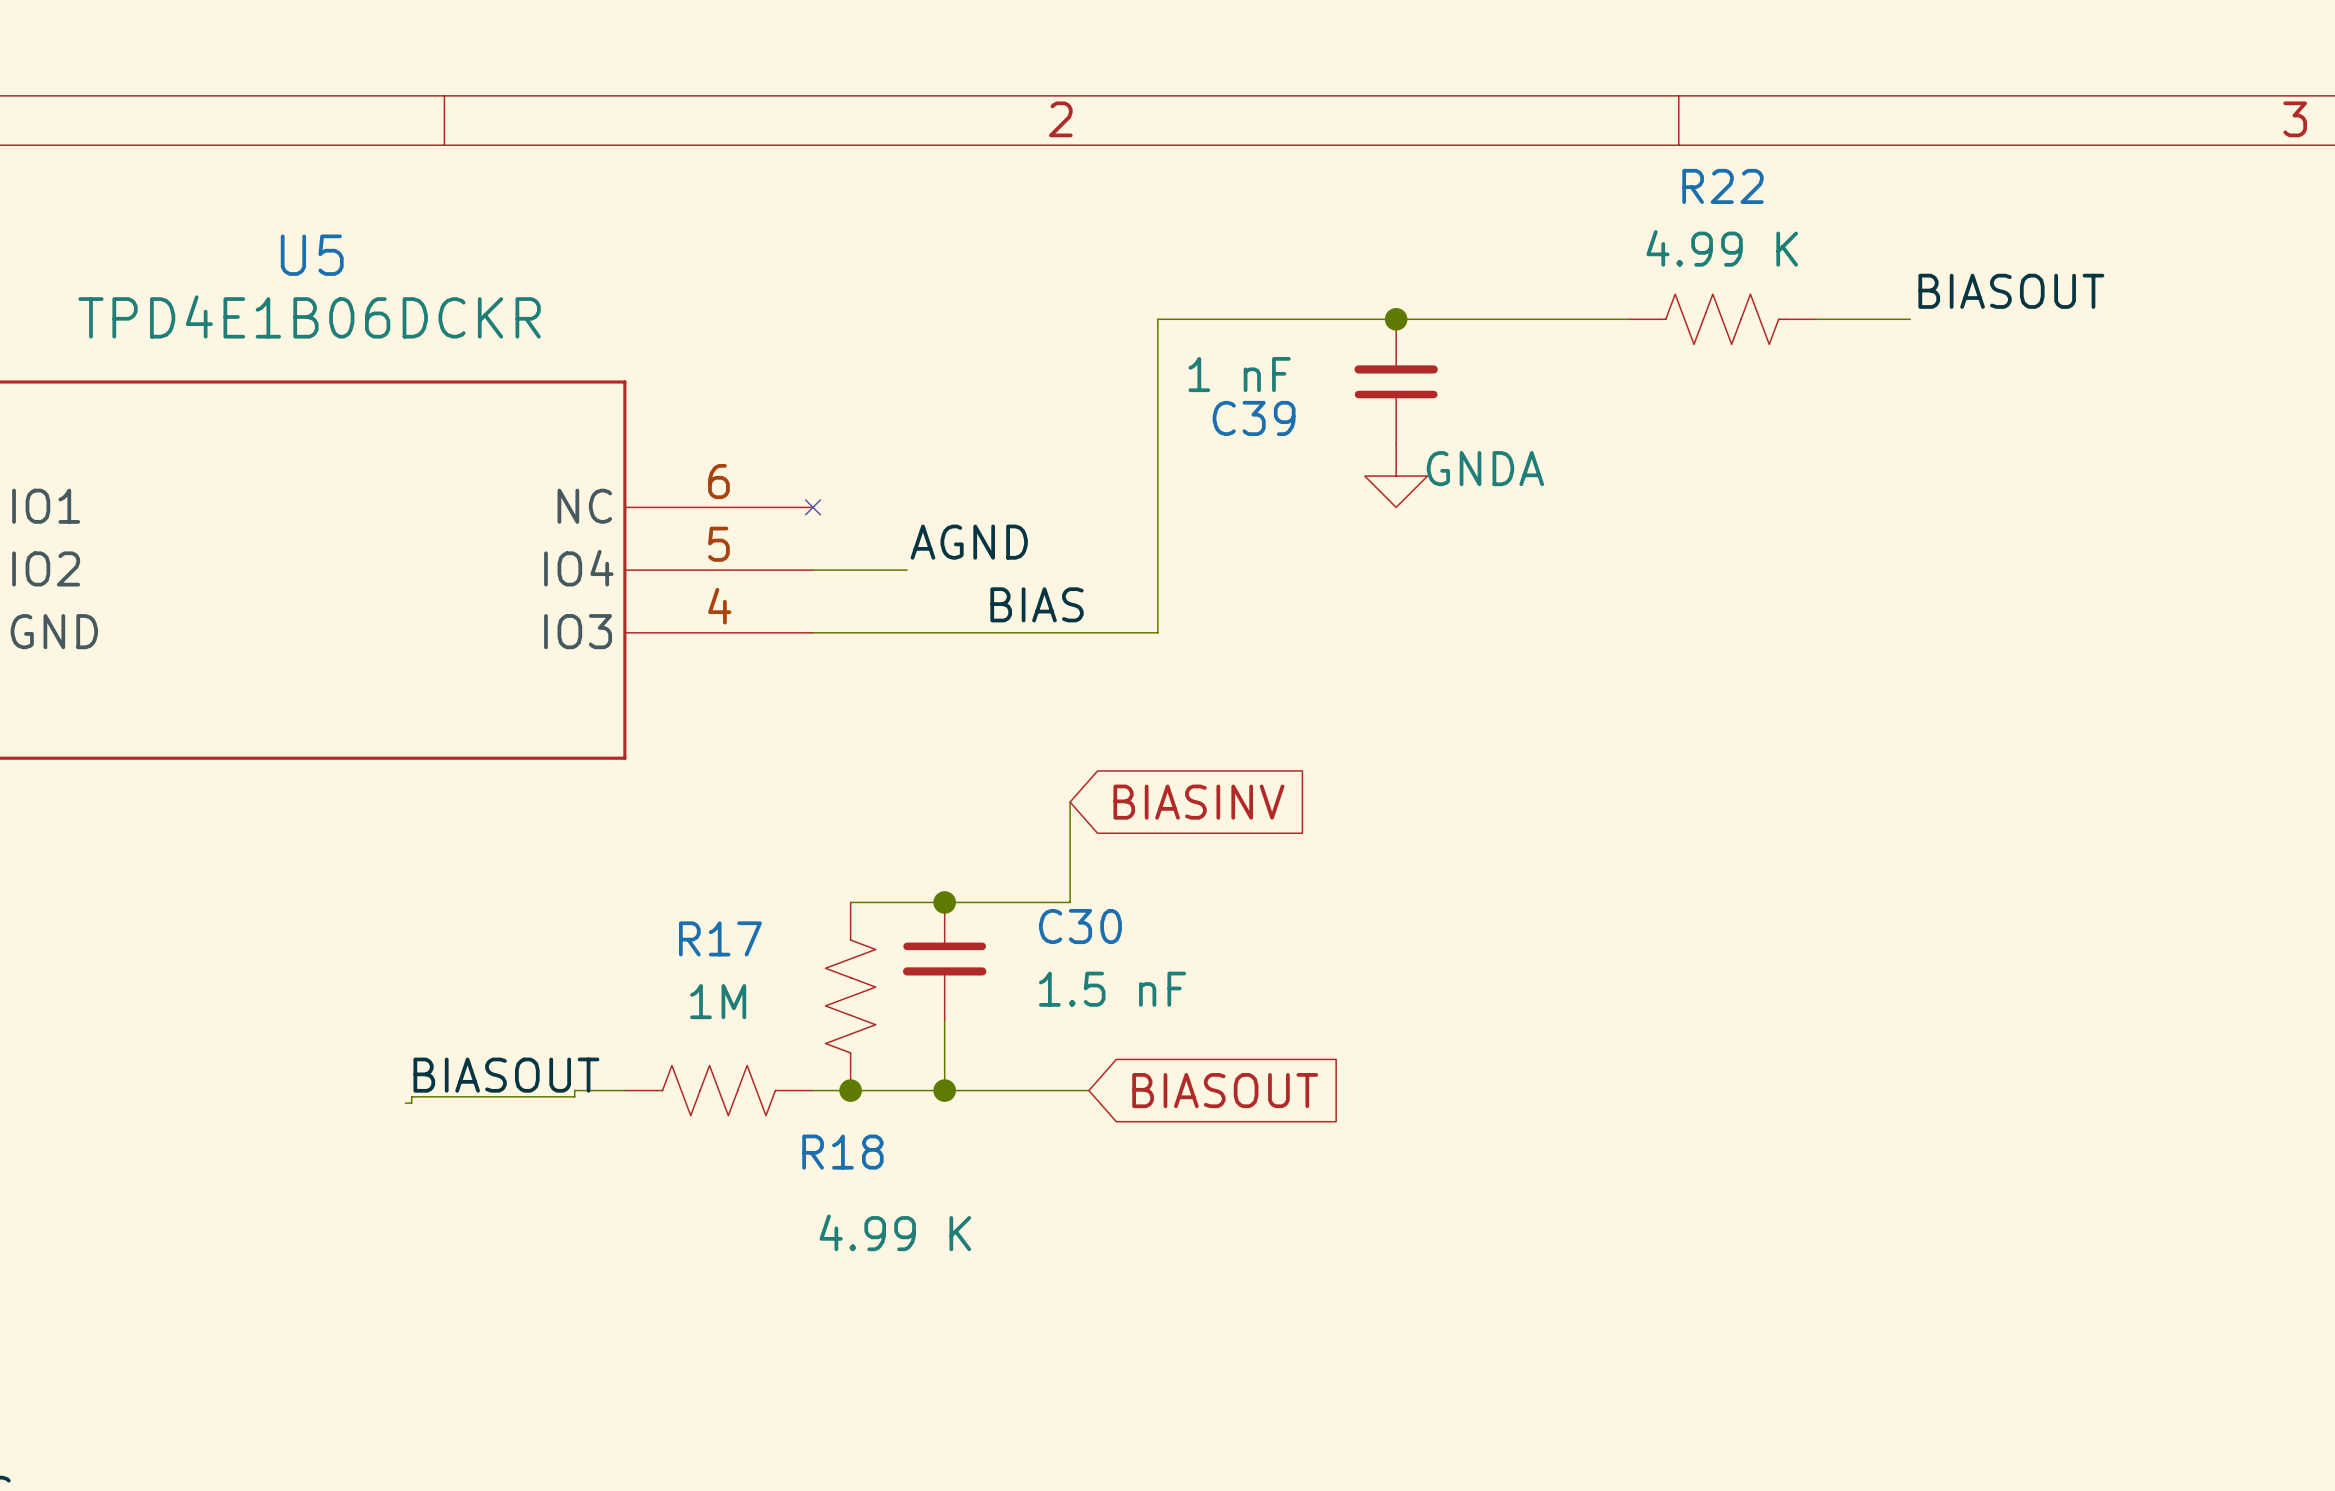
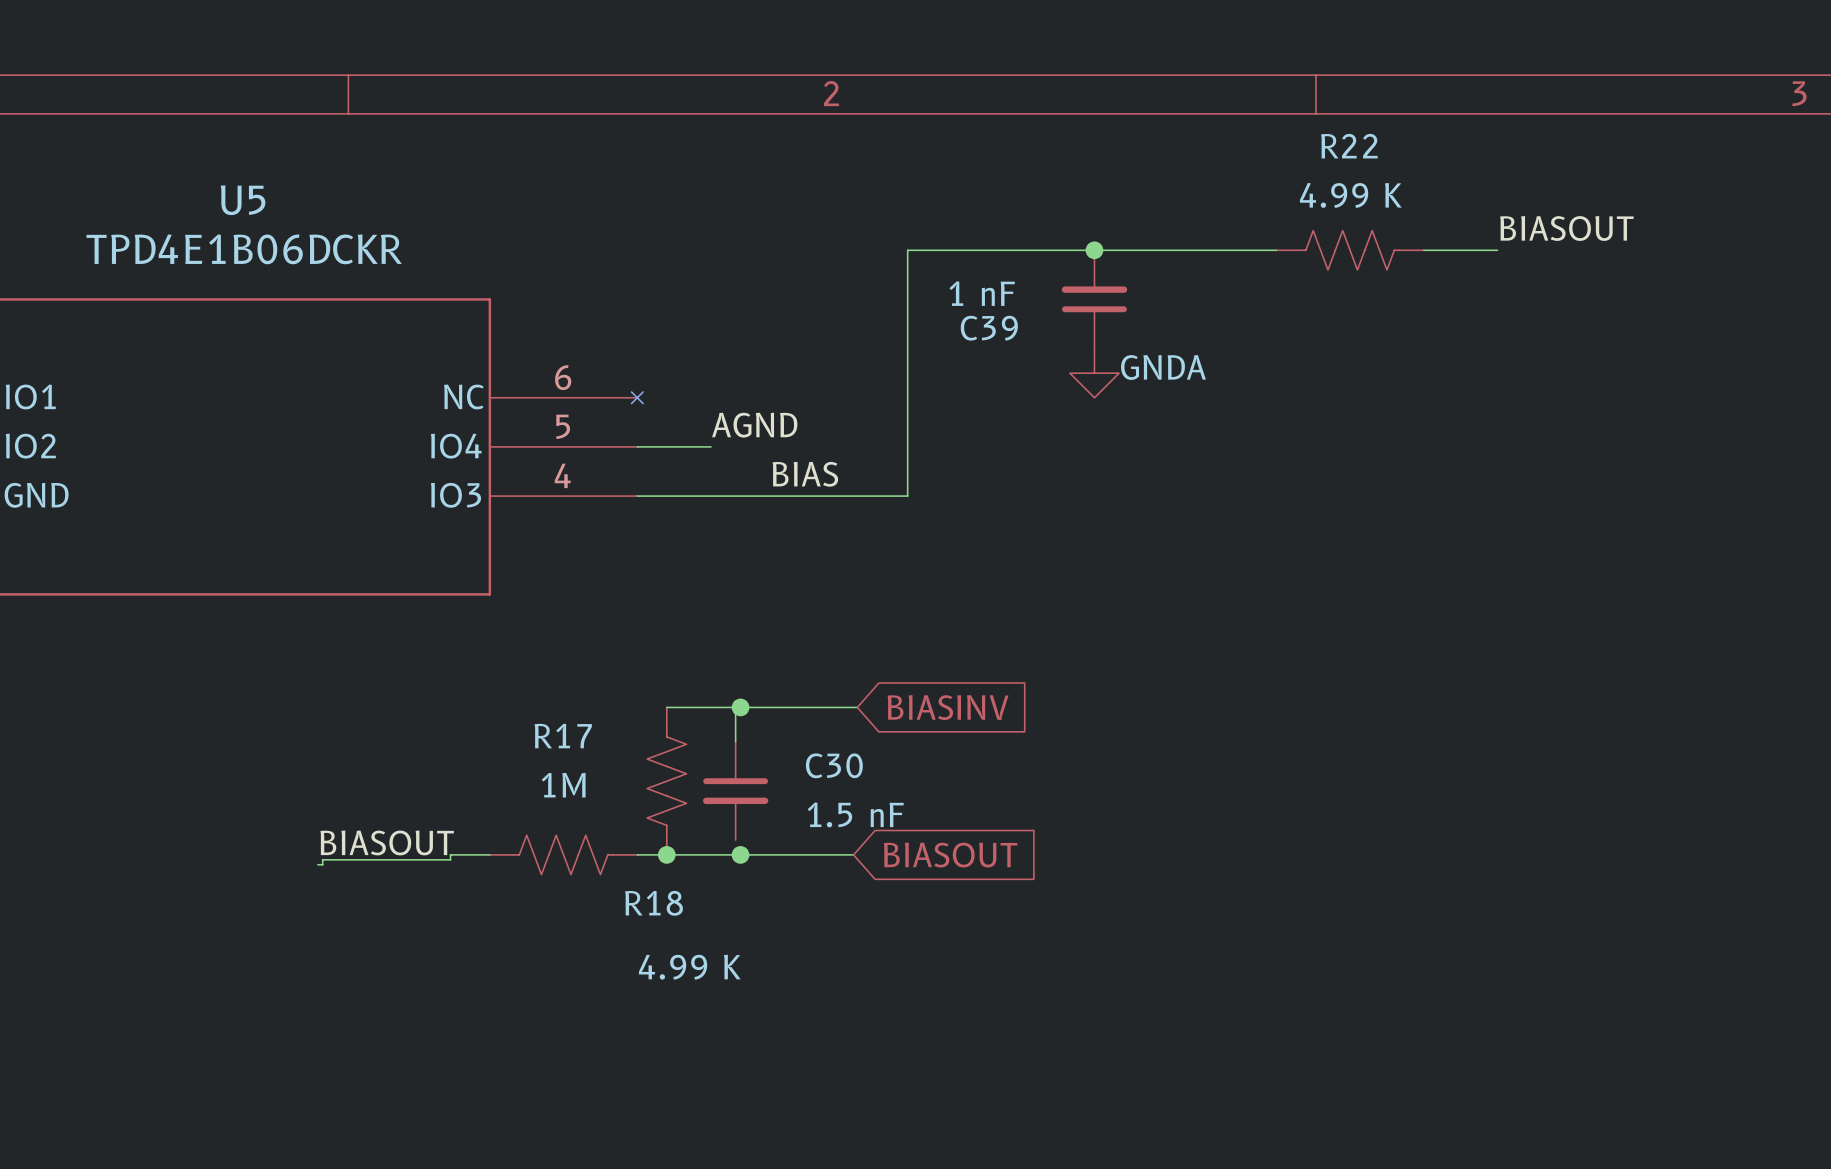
wire: (1070, 802) (1070, 902) -> (857, 707) (838, 707)
global label position: BIASINV (1198, 802) -> BIASINV (948, 707)
wire: none -> (735, 707) (735, 741)
C30 position: (944, 958) -> (735, 791)
wire: (944, 1021) (944, 1090) -> none

